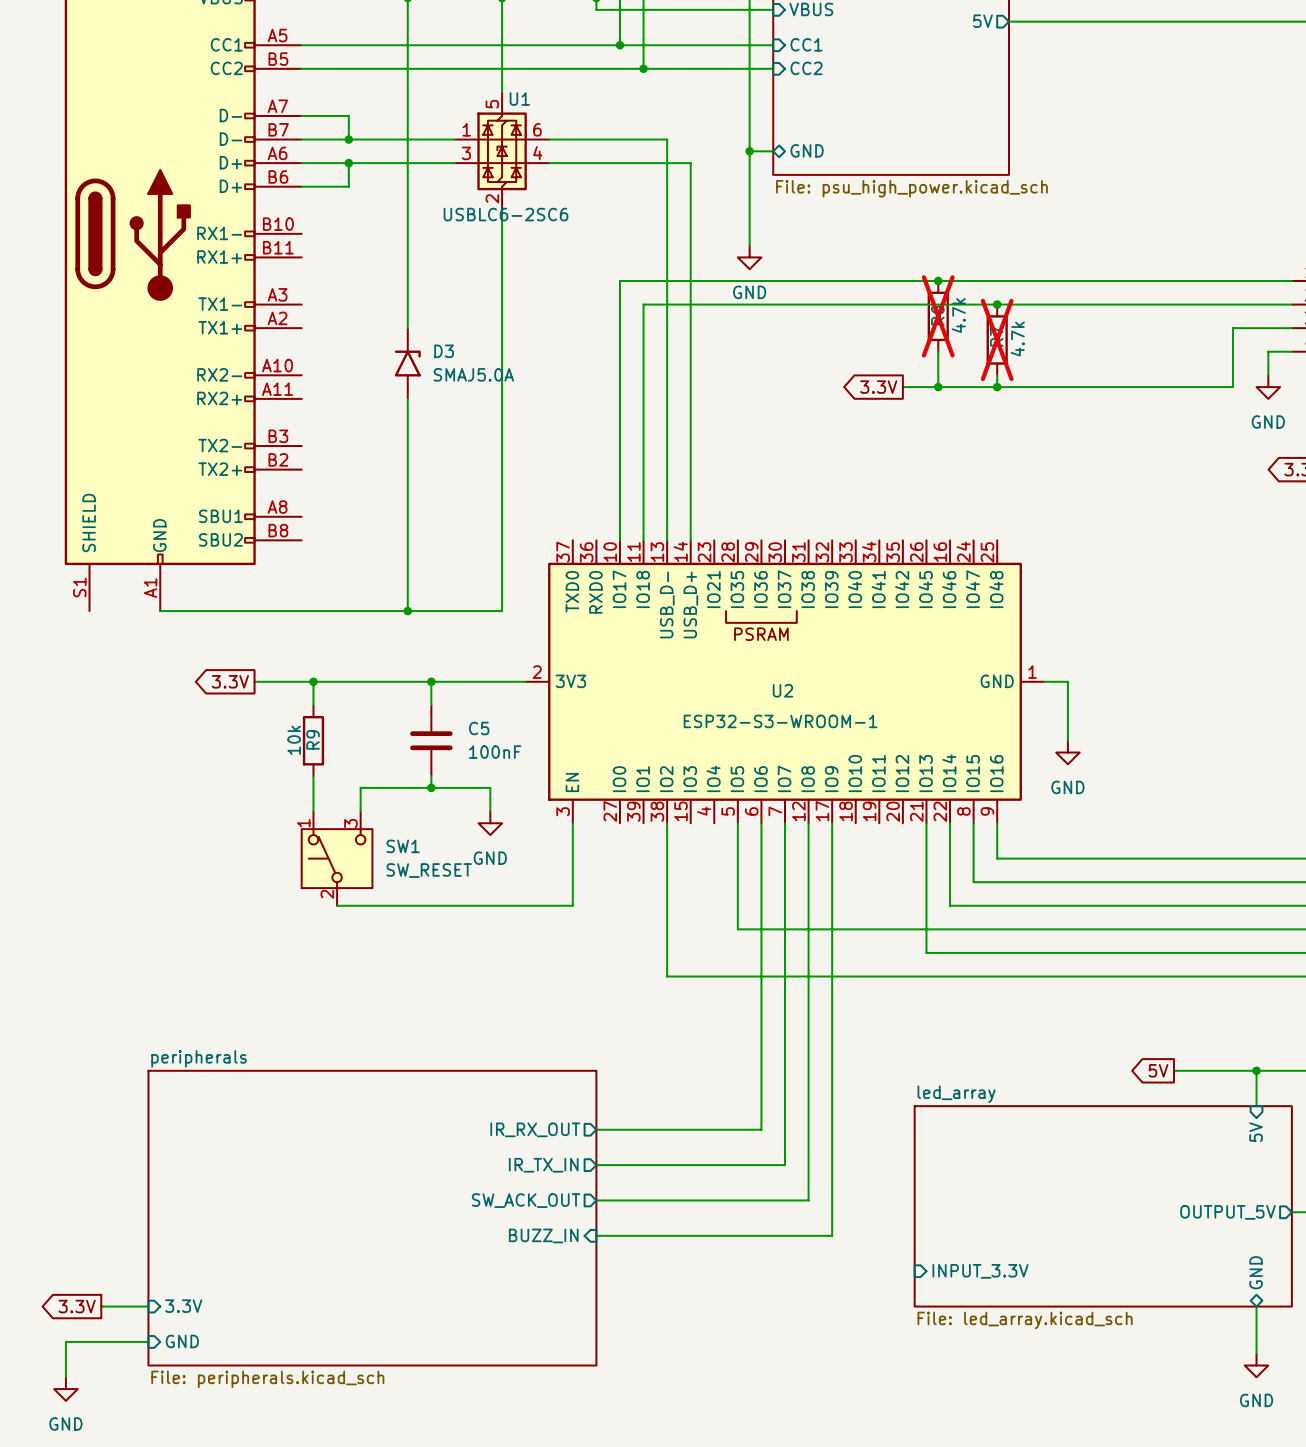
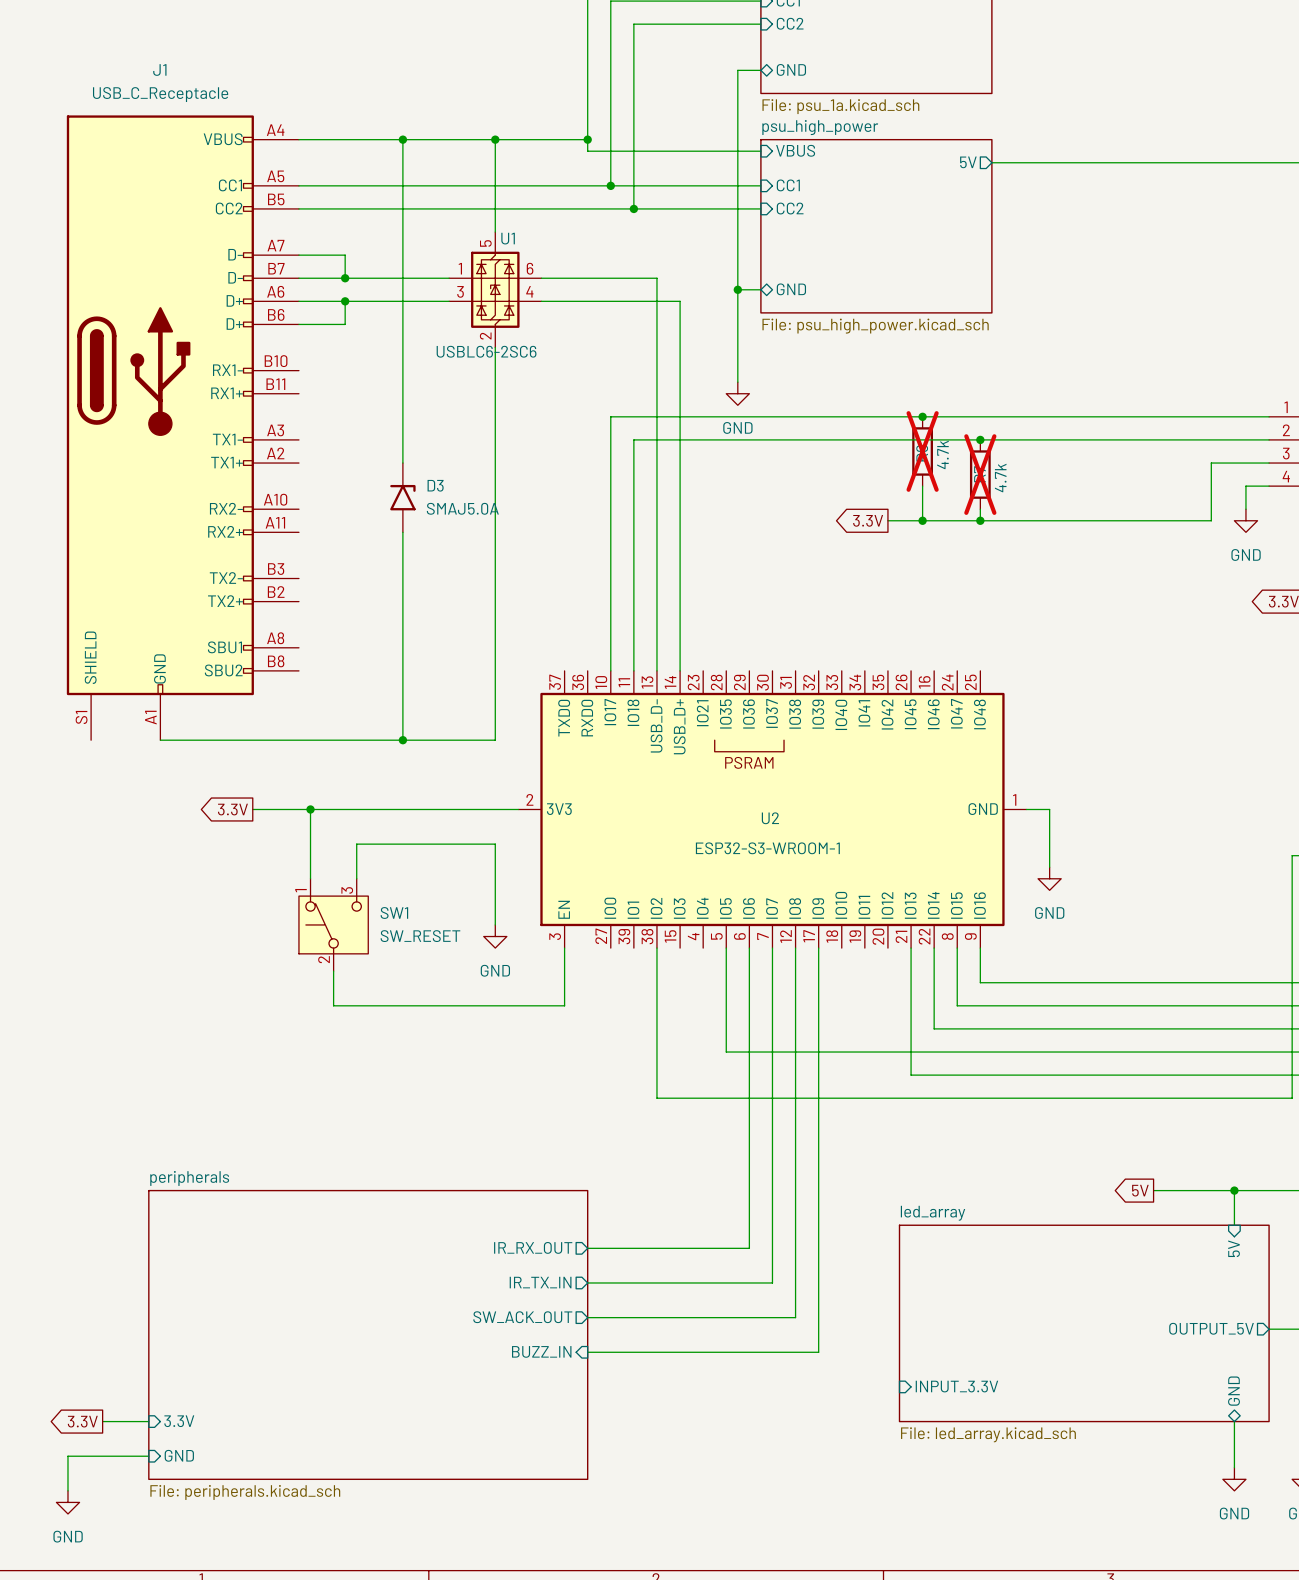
wire: (431, 681) (431, 705) -> none
junction: (431, 681) -> none
wire: none -> (310, 832) (310, 878)
R9: 10k (313, 740) -> none
C5: 100nF (431, 740) -> none
wire: none -> (356, 878) (356, 844) (495, 844) (495, 924)
wire: (431, 776) (431, 787) -> none
junction: (431, 787) -> none
wire: (360, 811) (360, 787) (490, 787) (490, 811) -> none
power symbol position: GND (490, 823) -> GND (495, 936)
SW1 position: (337, 858) -> (333, 924)
wire: (572, 882) (572, 905) (337, 905) -> (564, 1005) (333, 1005) (333, 971)

